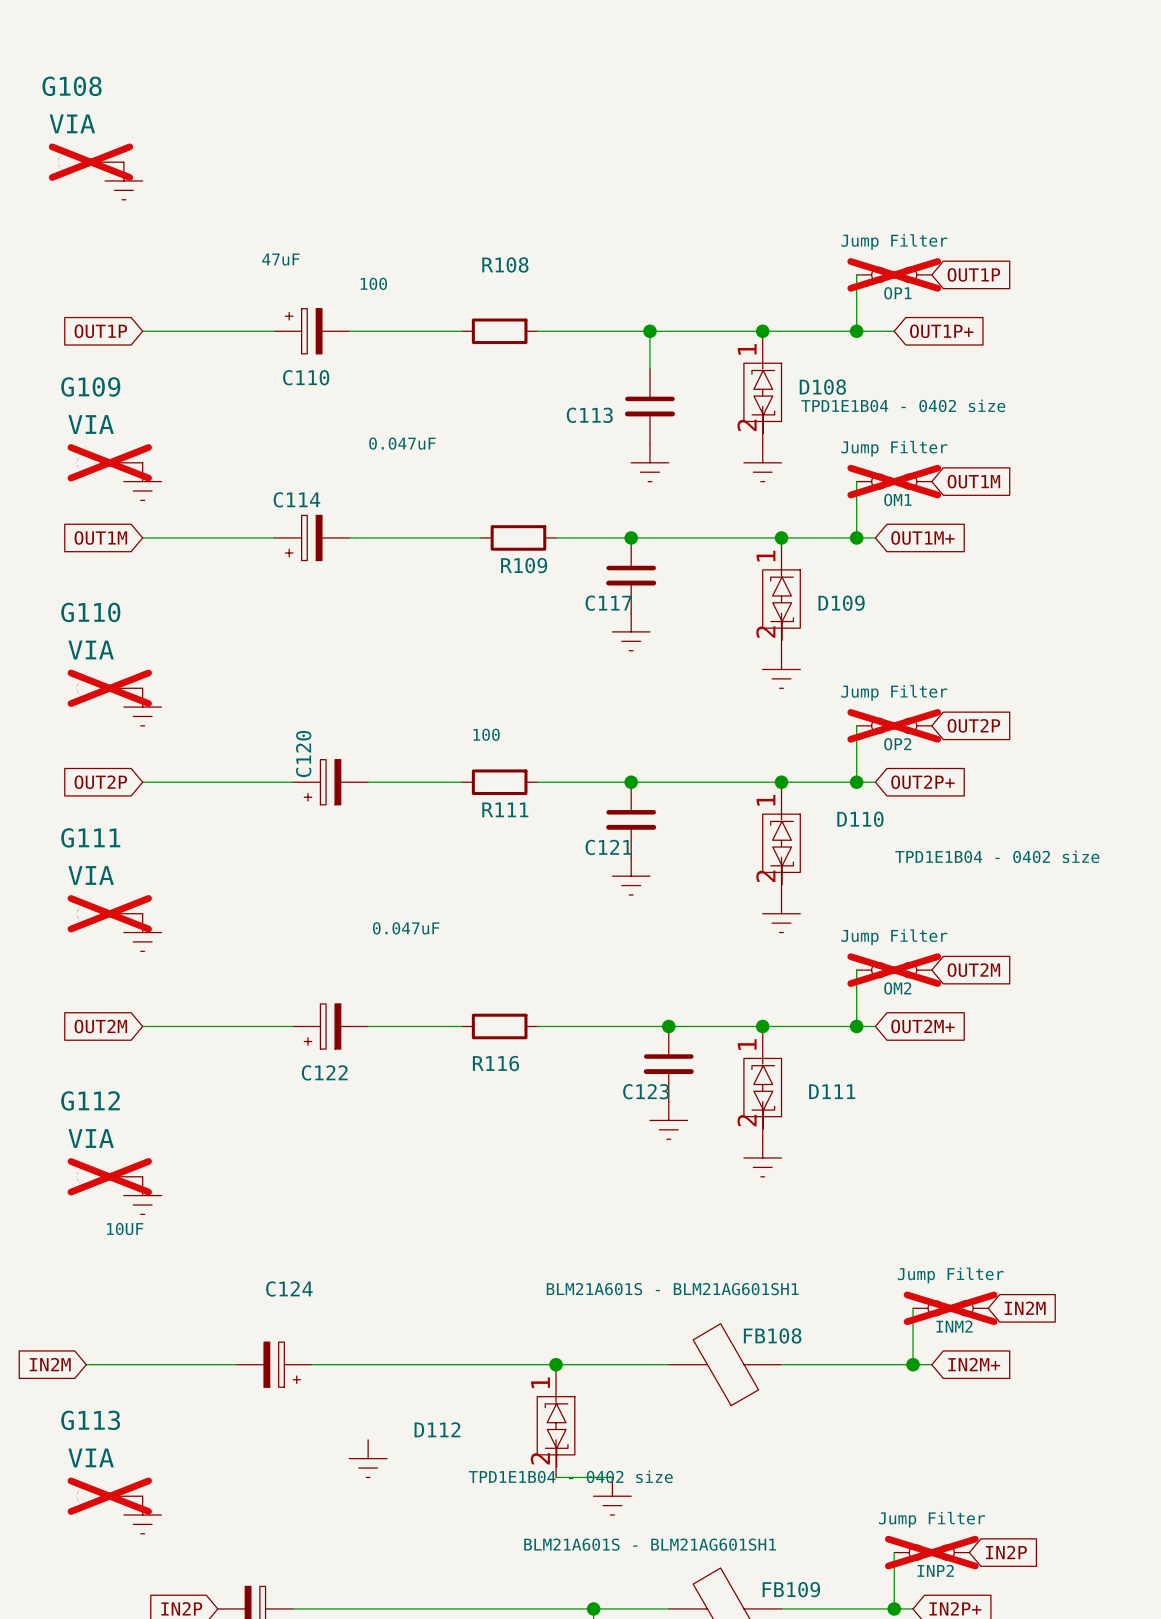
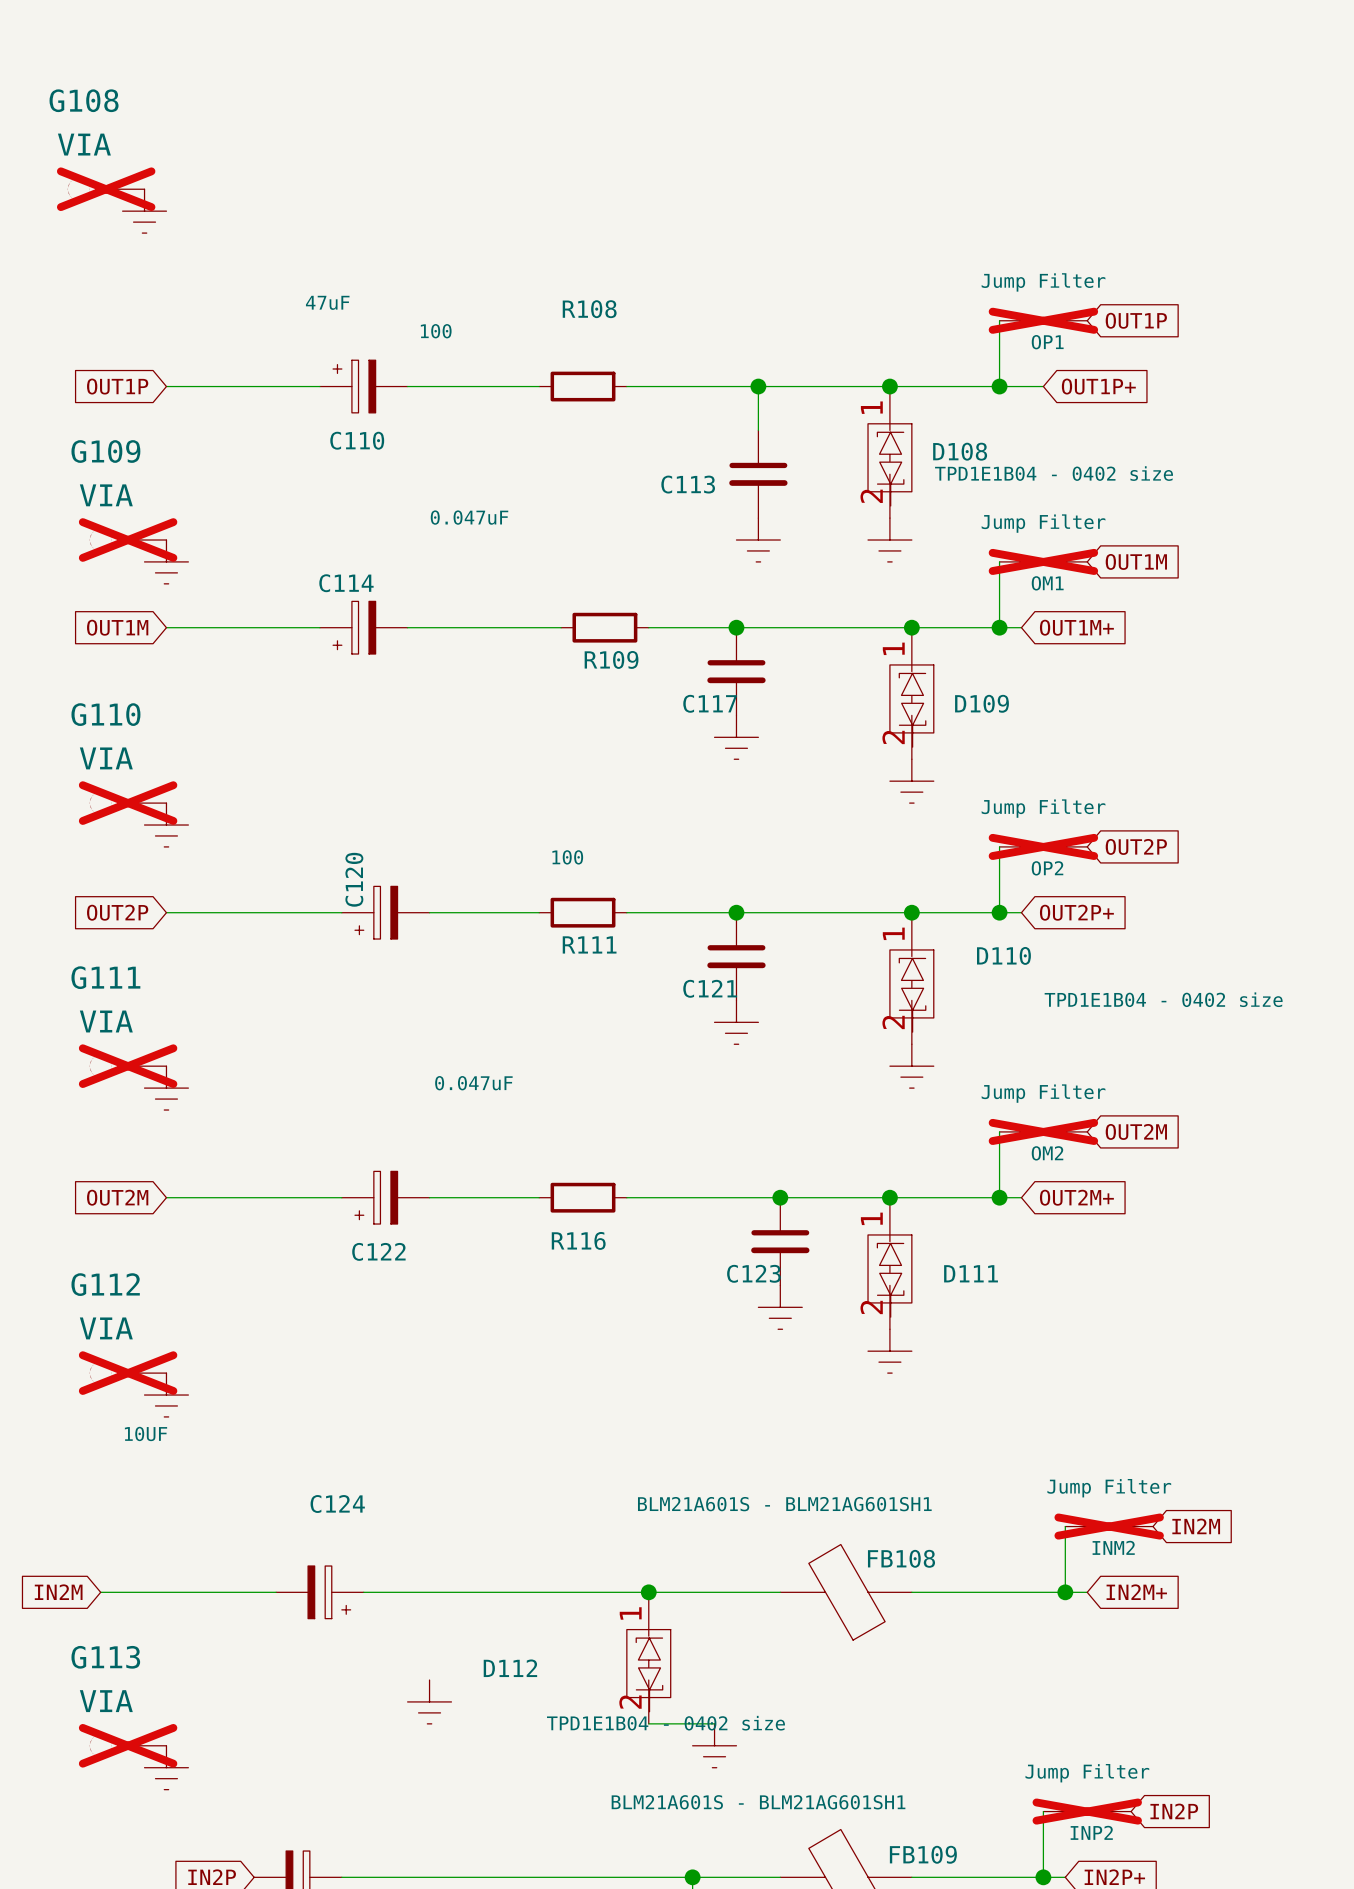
OP1 symbol: [856, 267, 932, 283] -> [999, 318, 1088, 323]
OM1 symbol: [856, 474, 932, 490] -> [999, 559, 1088, 565]
OP2 symbol: [856, 718, 932, 734] -> [999, 844, 1088, 850]
OM2 symbol: [856, 962, 932, 978] -> [999, 1129, 1088, 1135]
INM2 symbol: [913, 1300, 989, 1316] -> [1065, 1524, 1154, 1529]
INP2 symbol: [894, 1545, 970, 1561] -> [1043, 1809, 1132, 1814]

